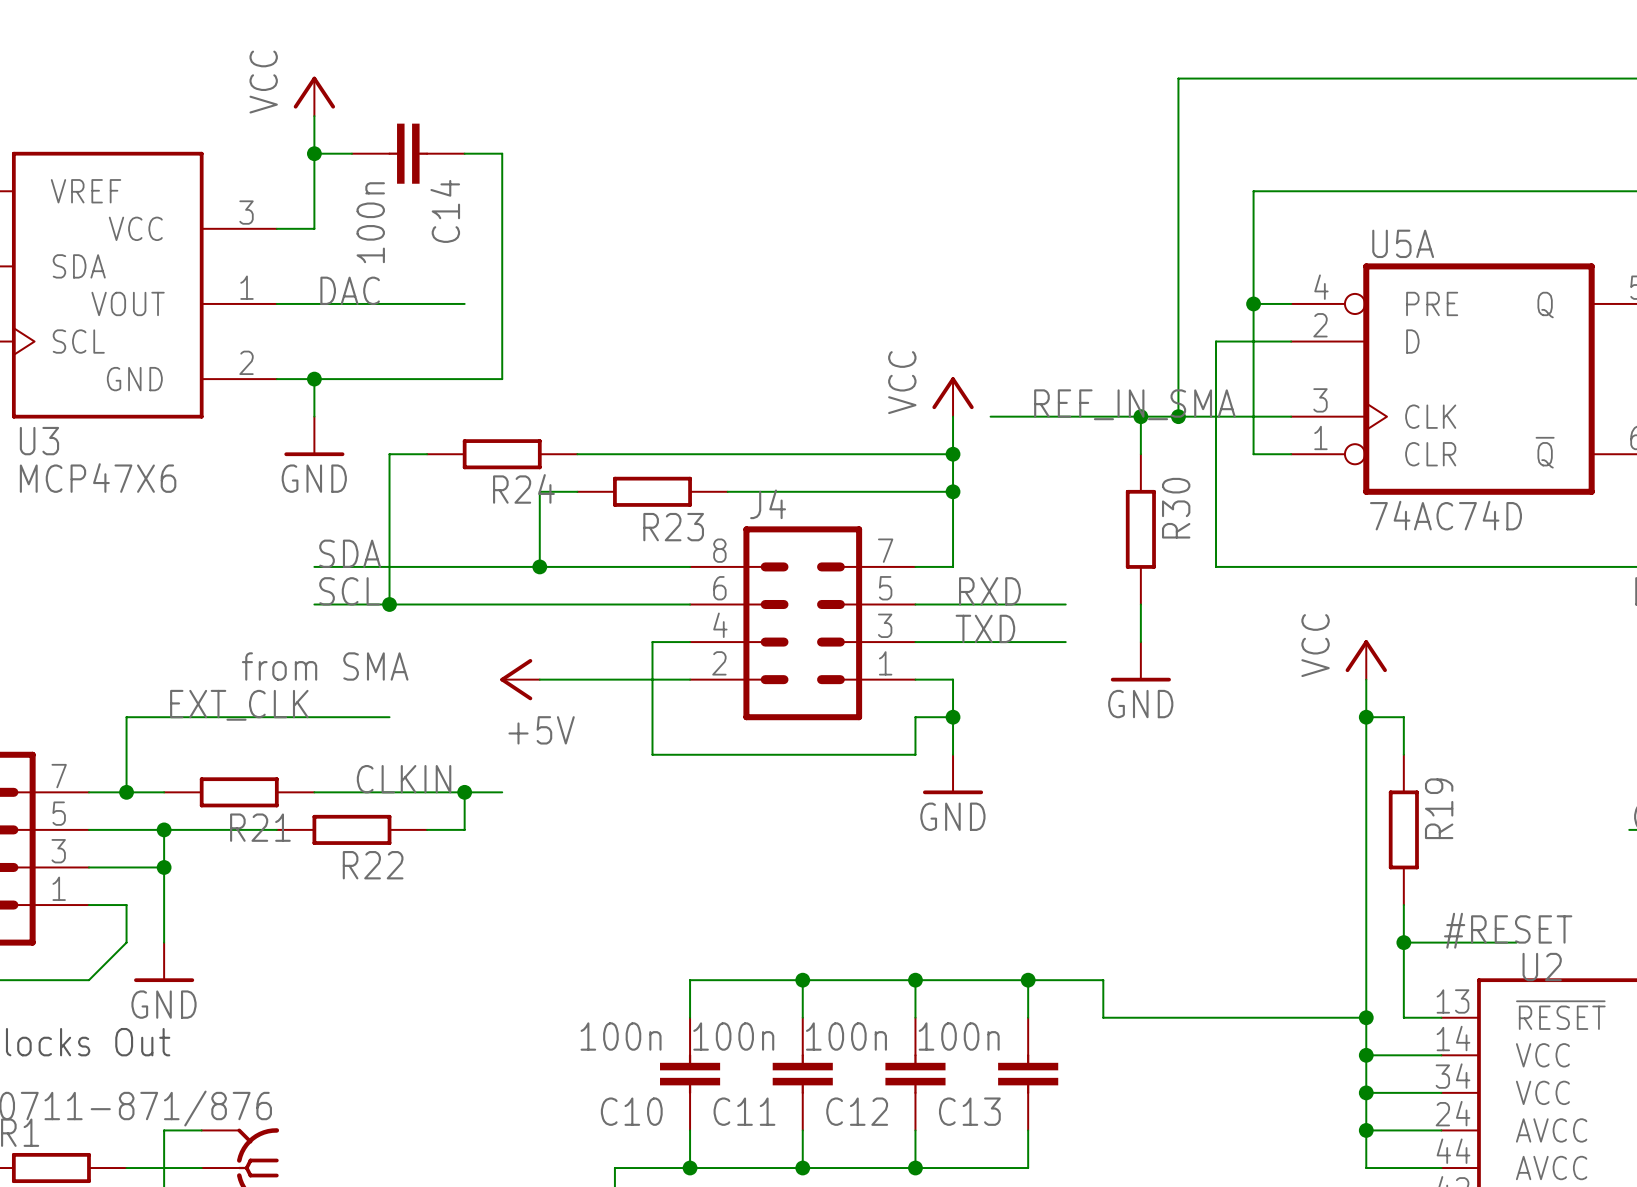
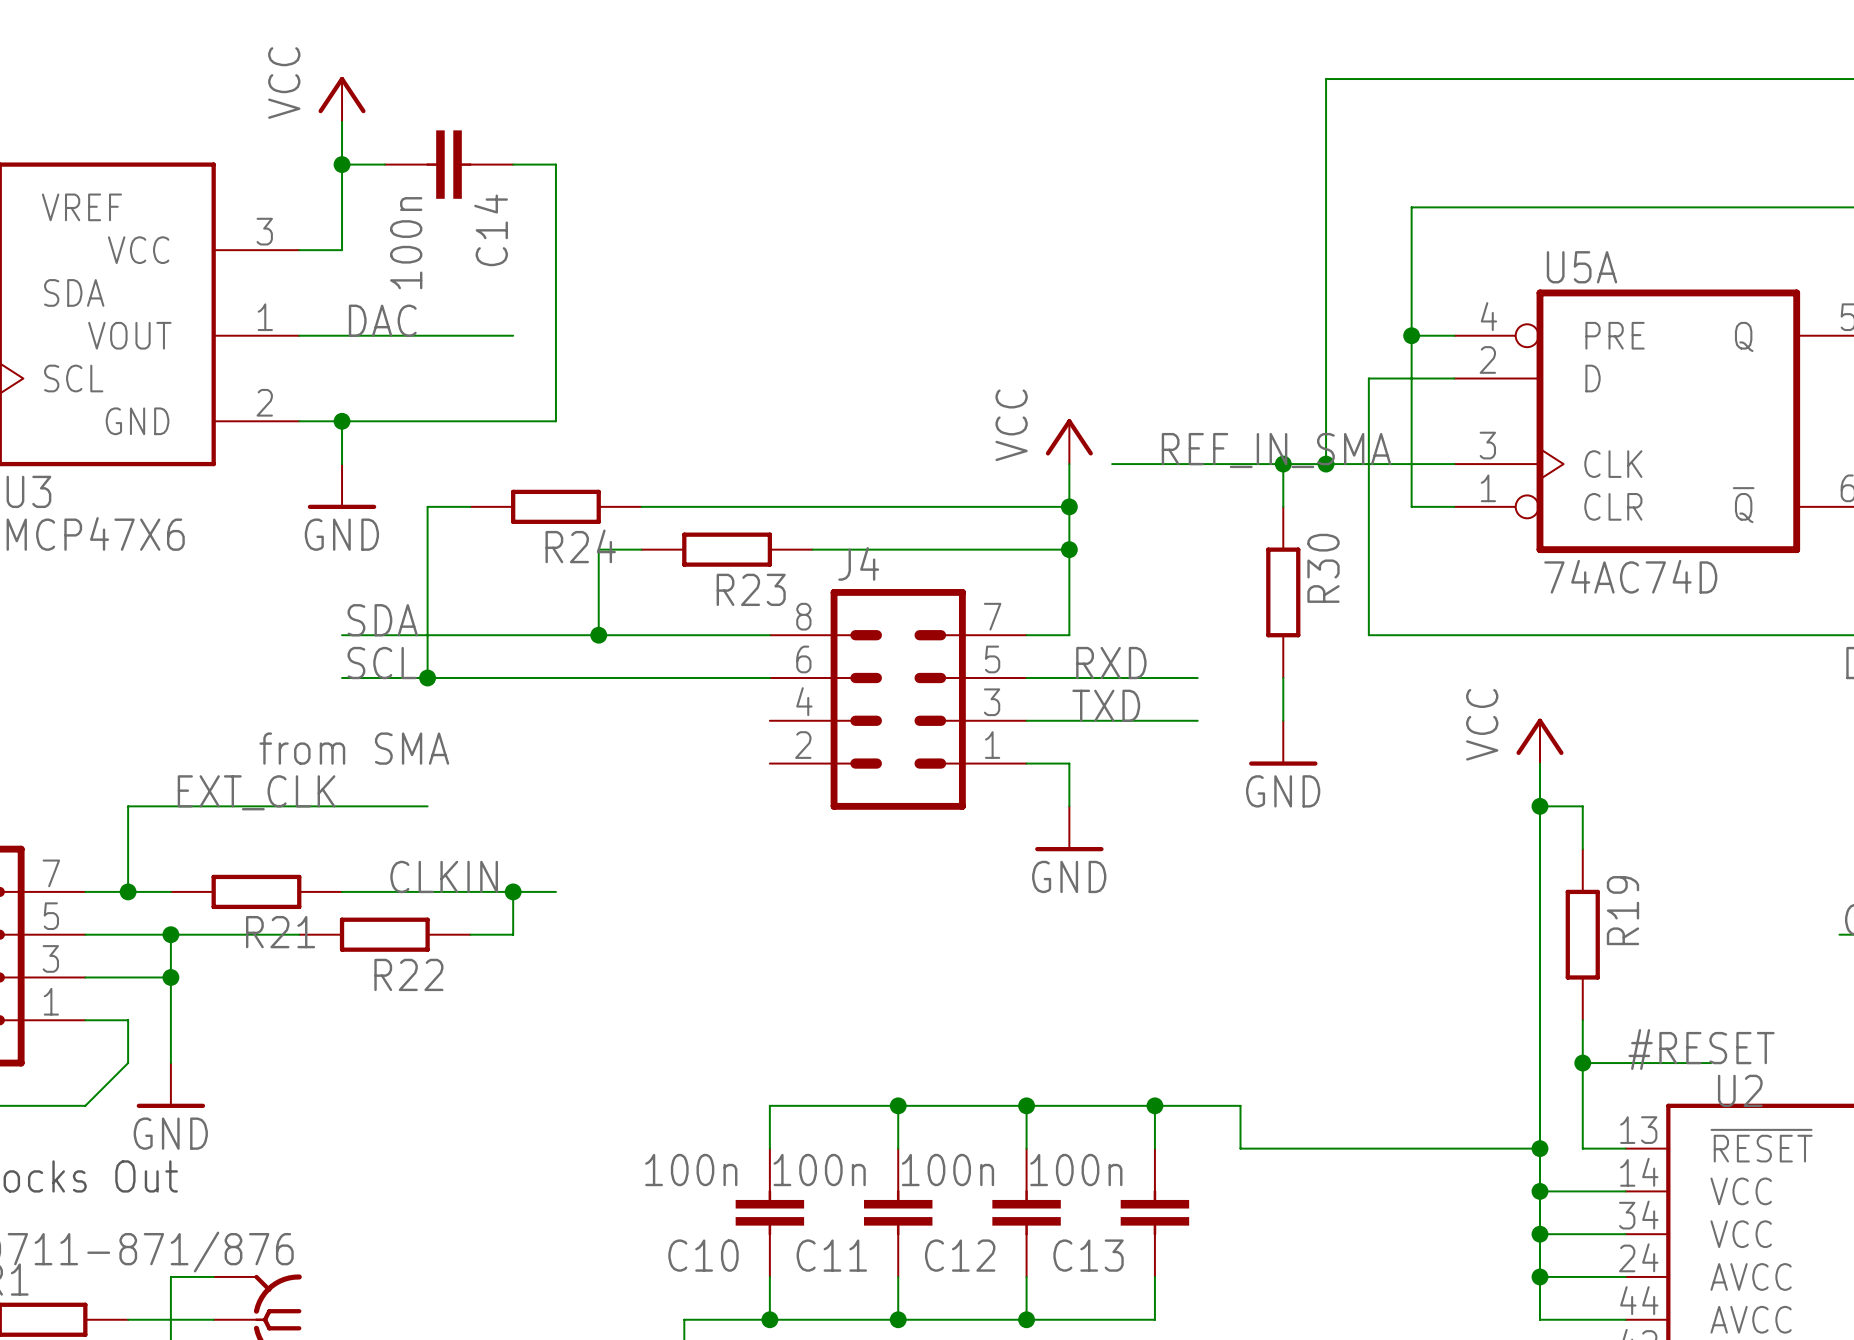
wire: (690, 642) (652, 642) (652, 754) (915, 754) (915, 717) (953, 717) (953, 754) -> none
power symbol: +5V (520, 679) -> none
wire: (539, 679) (690, 679) -> none
junction: (953, 717) -> none
power symbol position: GND (953, 774) -> GND (1069, 828)

